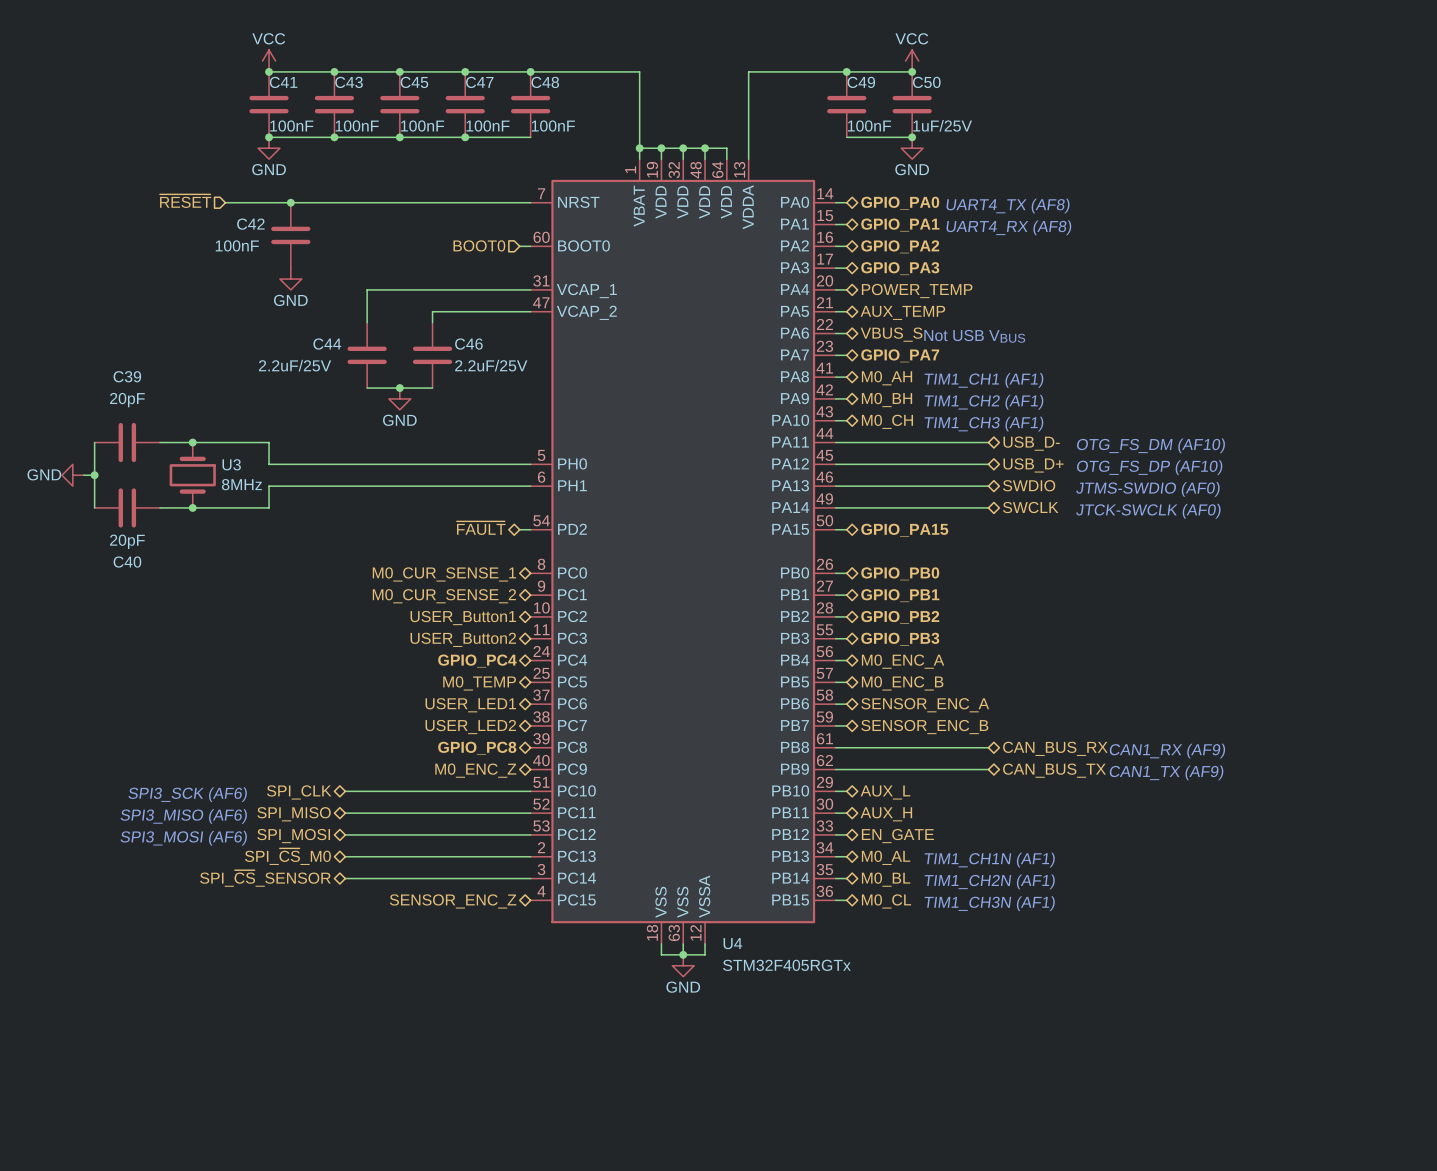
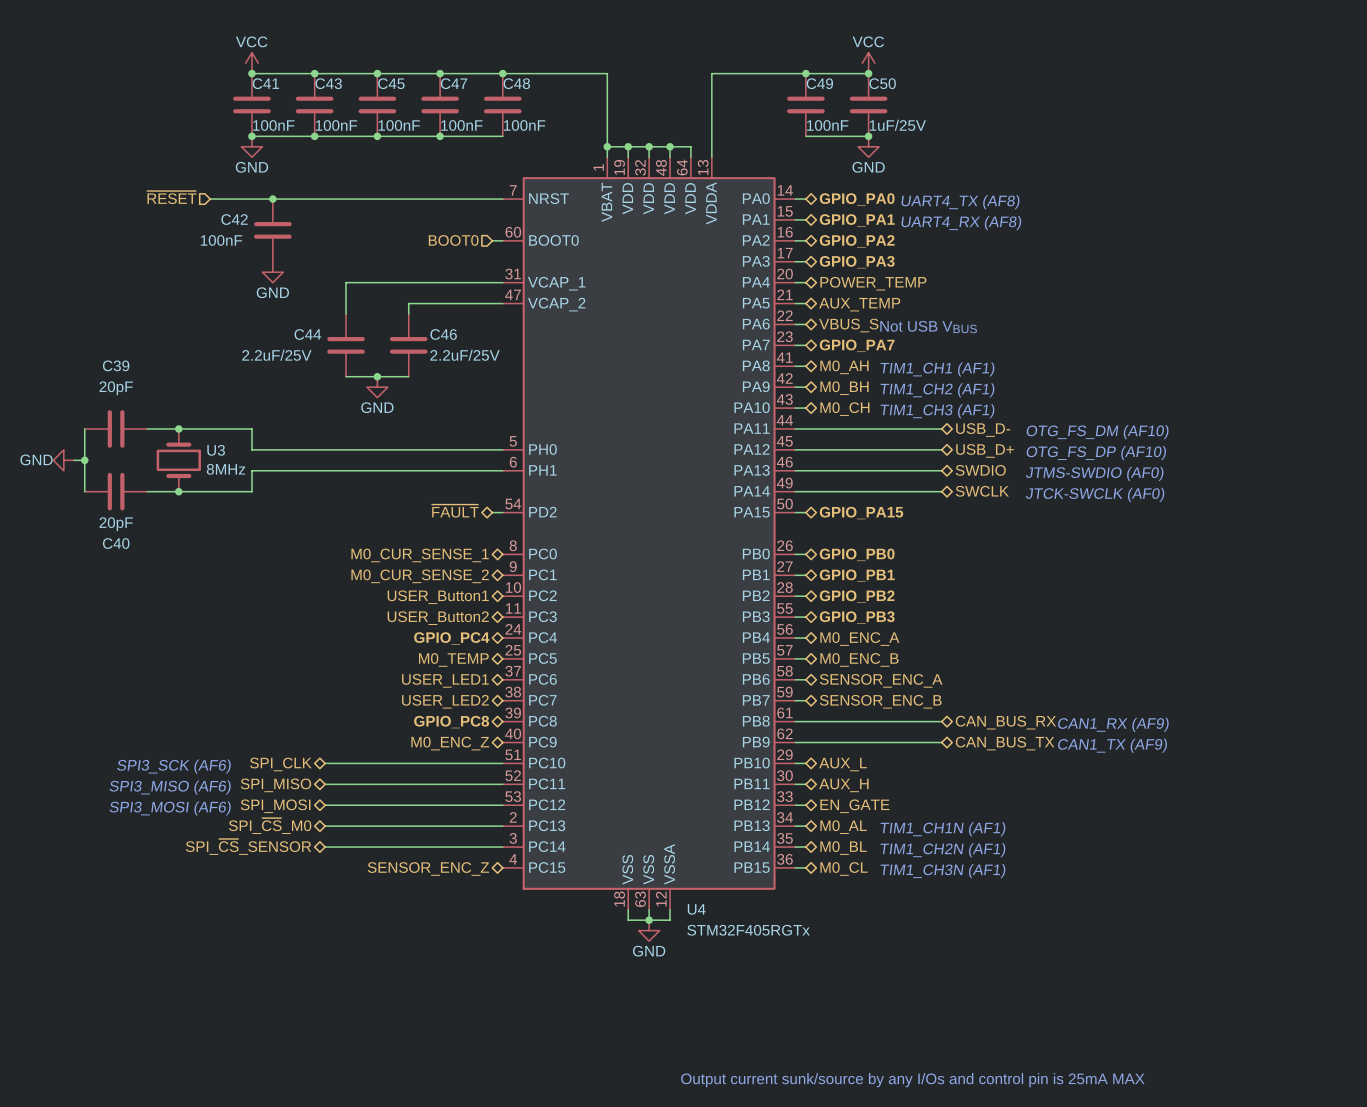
text: none -> Output current sunk/source by any I/Os and control pin is 25mA MAX (912, 1080)

